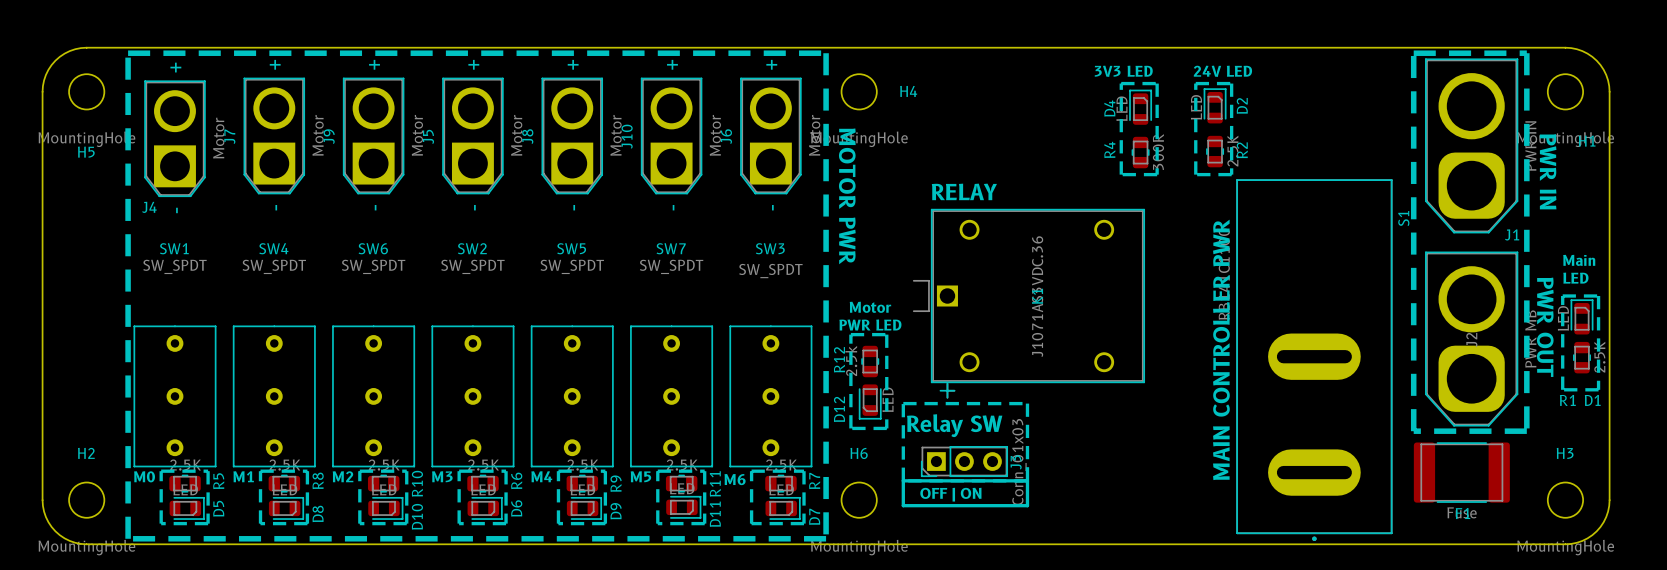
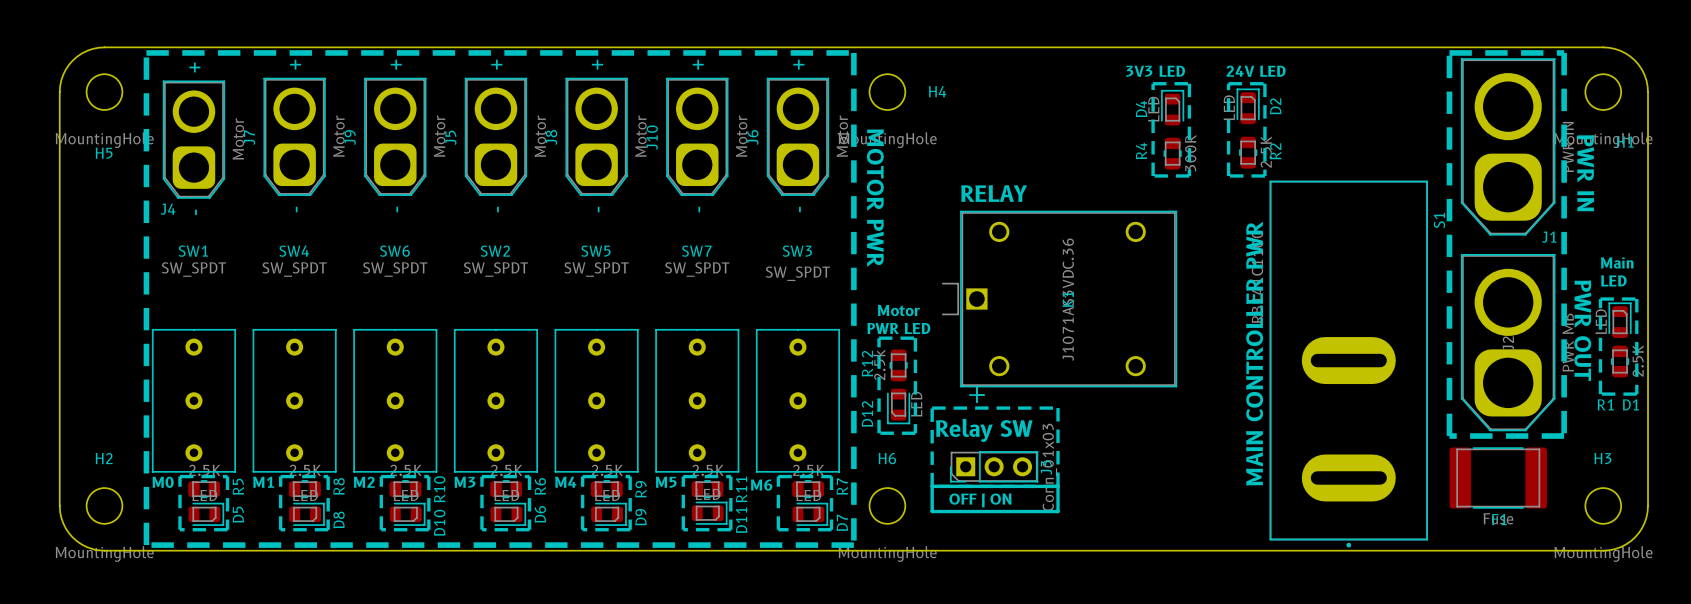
J7 footprint: [243, 77, 305, 195] -> [263, 77, 326, 196]
J9 footprint: [343, 77, 405, 195] -> [364, 77, 427, 196]
J5 footprint: [442, 77, 504, 195] -> [464, 77, 527, 196]
J8 footprint: [541, 77, 603, 195] -> [565, 77, 628, 196]
J10 footprint: [641, 77, 703, 195] -> [666, 77, 729, 196]
J6 footprint: [740, 77, 802, 195] -> [766, 77, 829, 196]
J4 footprint: [144, 80, 206, 197] -> [162, 80, 225, 199]

